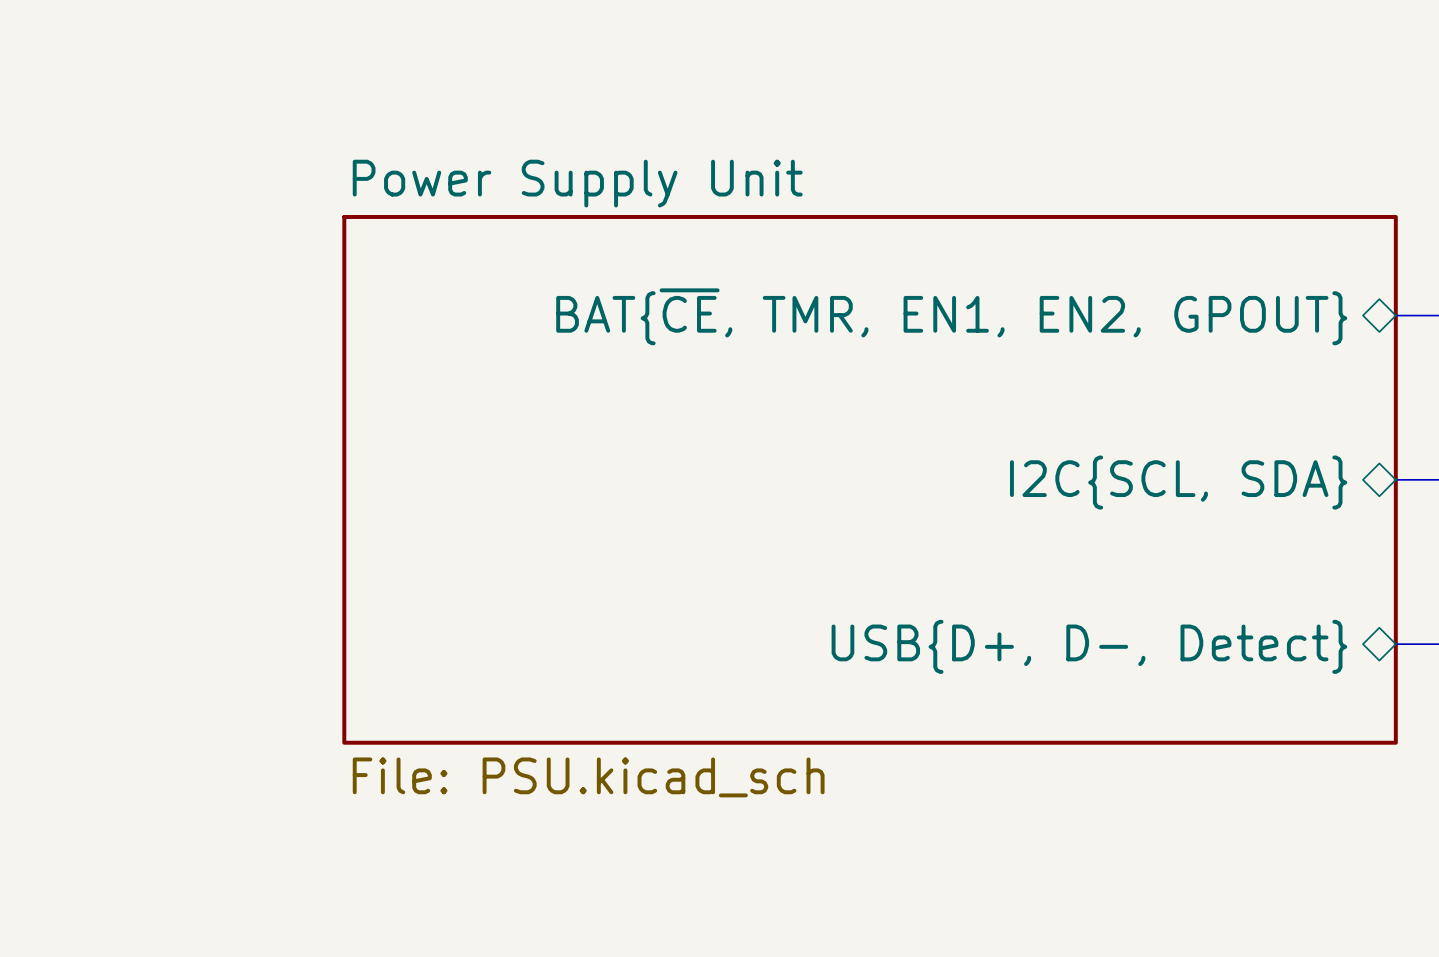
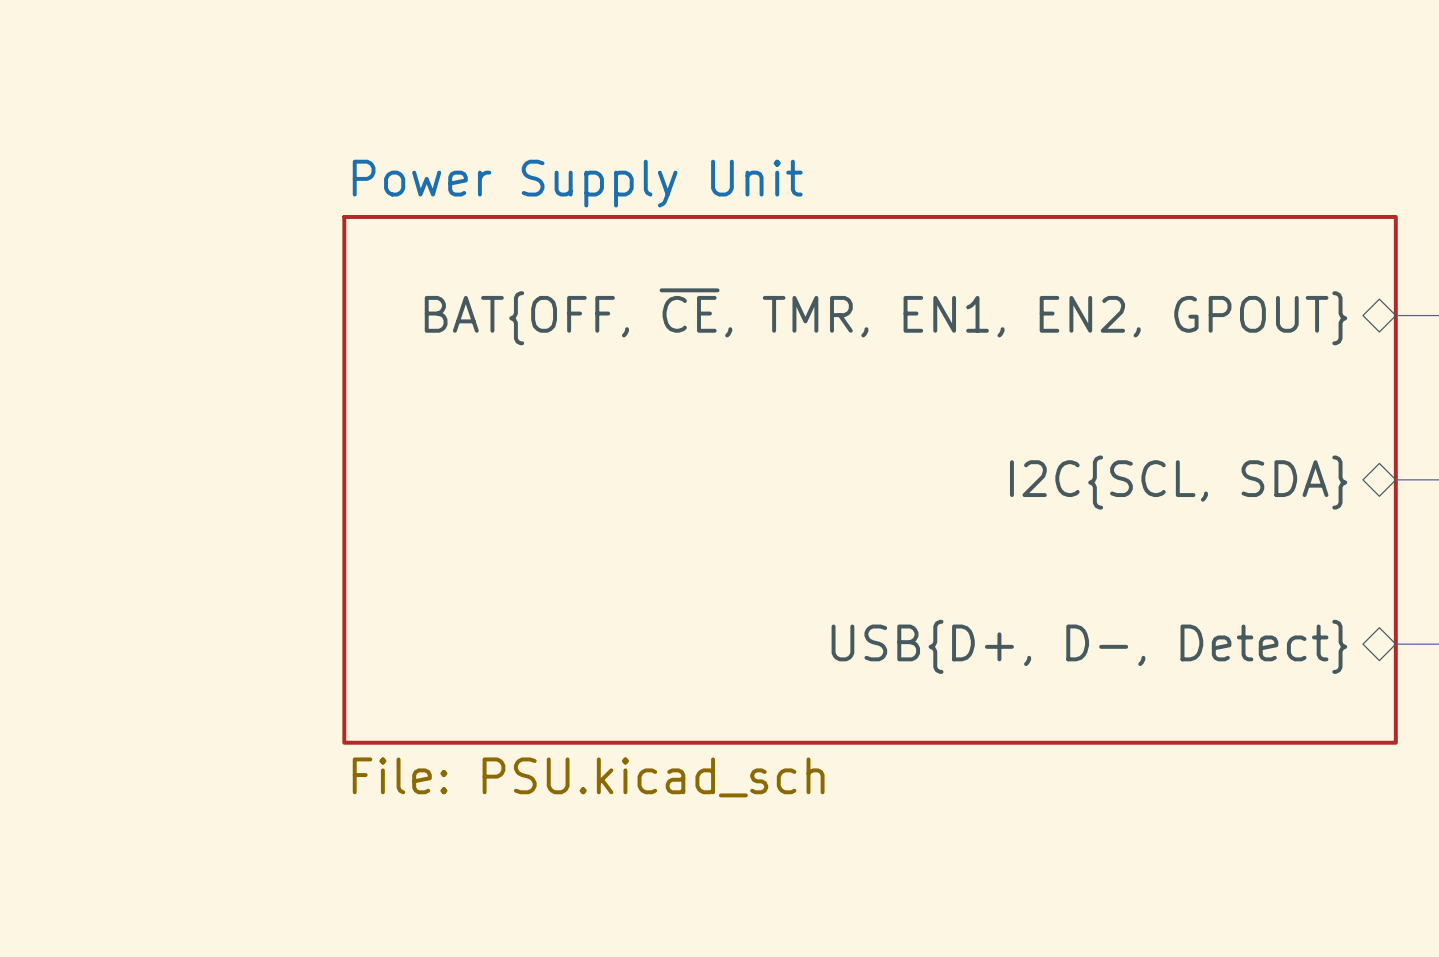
sheet pin: BAT{~{CE}, TMR, EN1, EN2, GPOUT} (951, 316) -> BAT{OFF, ~{CE}, TMR, EN1, EN2, GPOUT} (885, 316)

